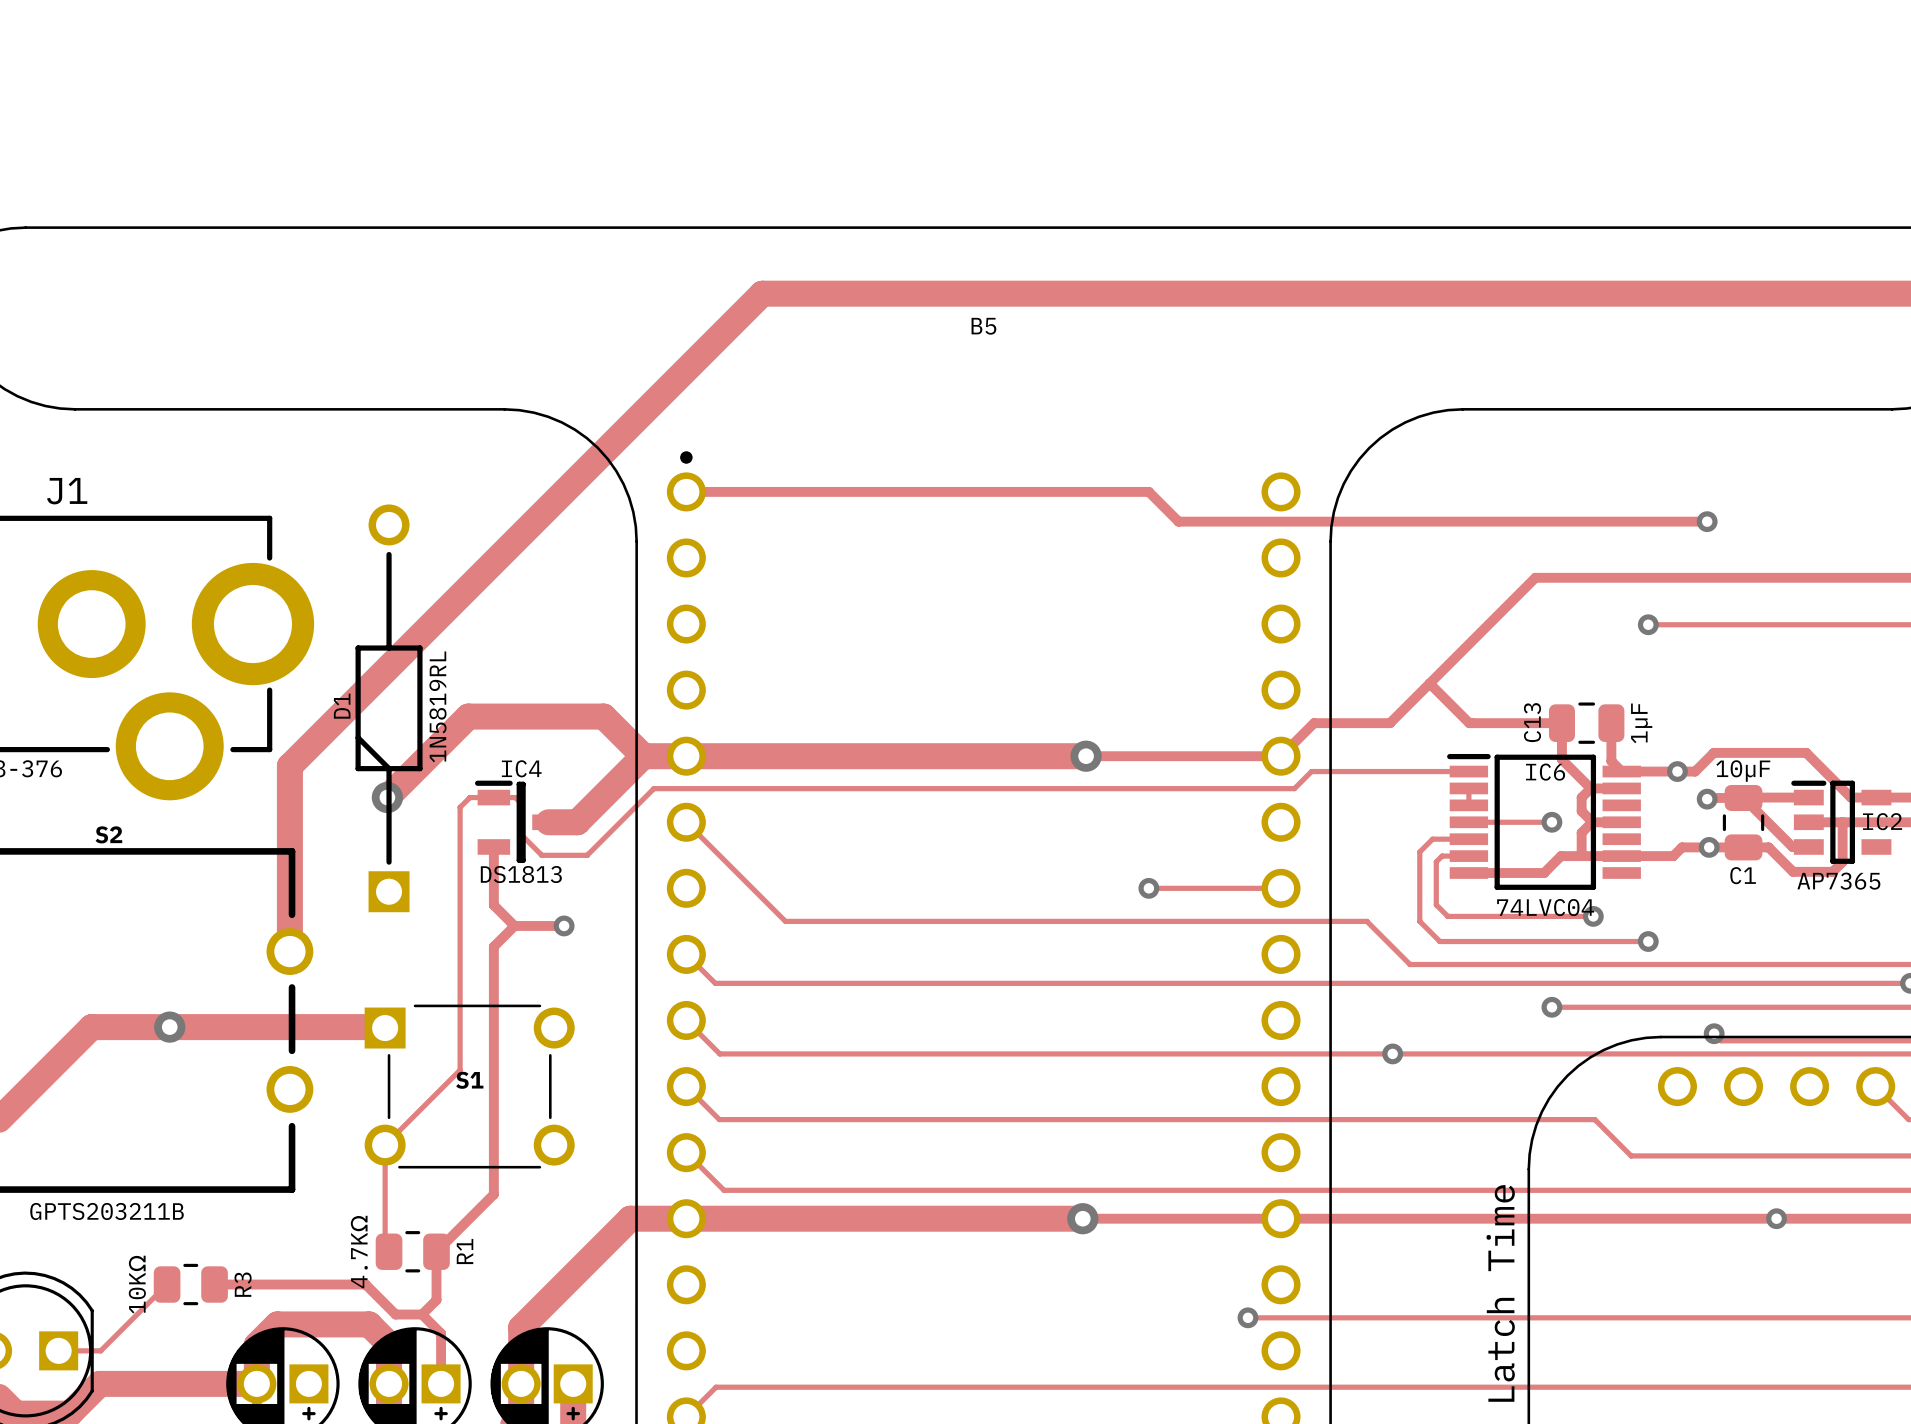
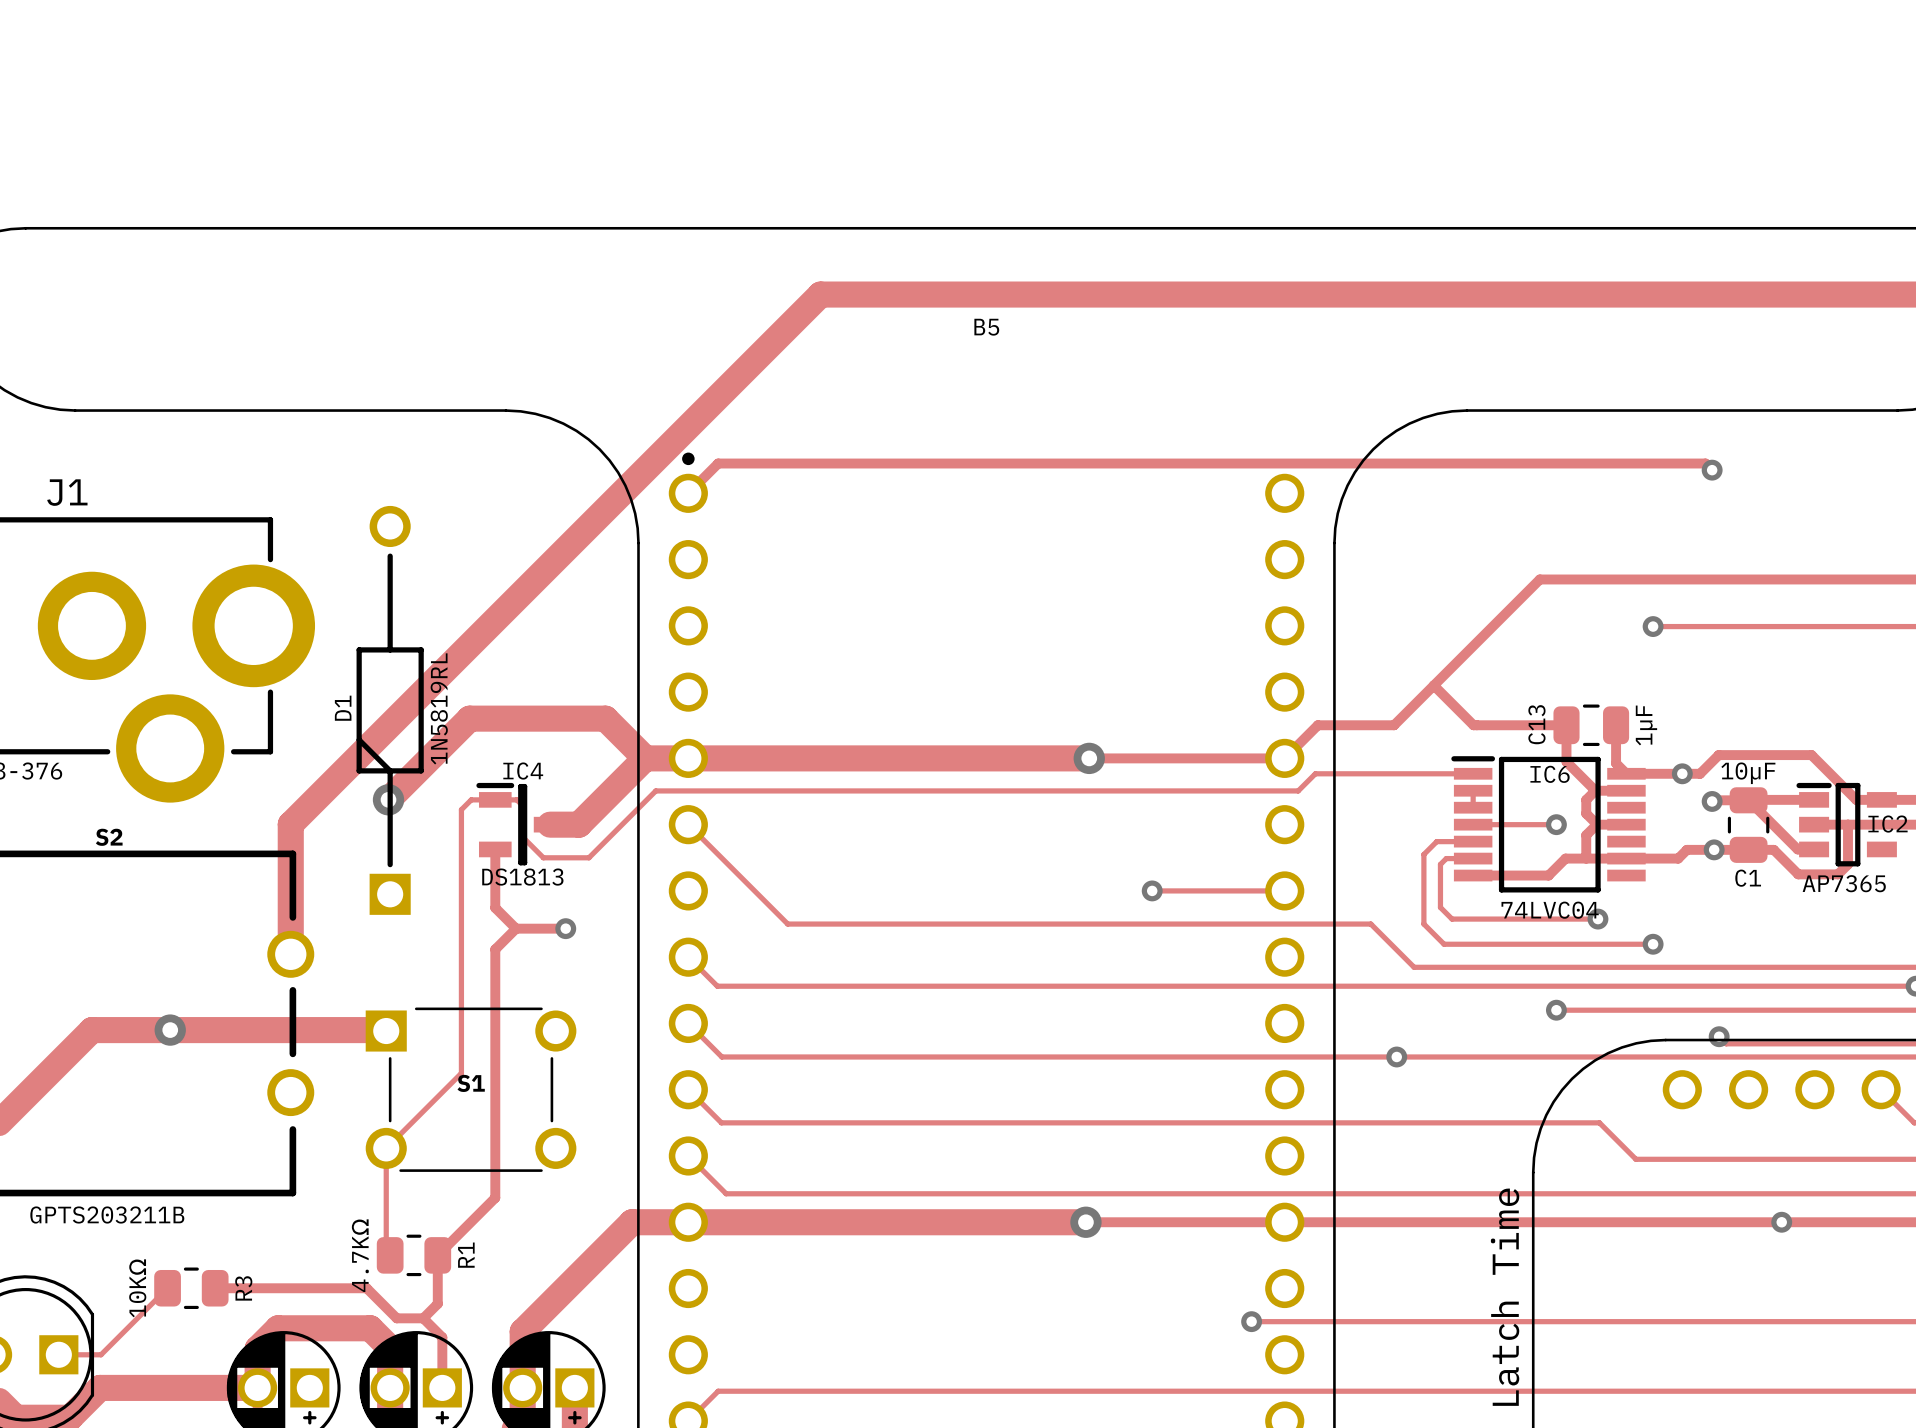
track: (818, 293) (762, 293) (289, 766) (289, 821) -> (820, 294) (290, 824)
track: (686, 491) (1148, 491) (1178, 521) (1707, 521) -> (688, 493) (718, 463) (1705, 463) (1712, 470)
via position: (1707, 521) -> (1712, 470)

